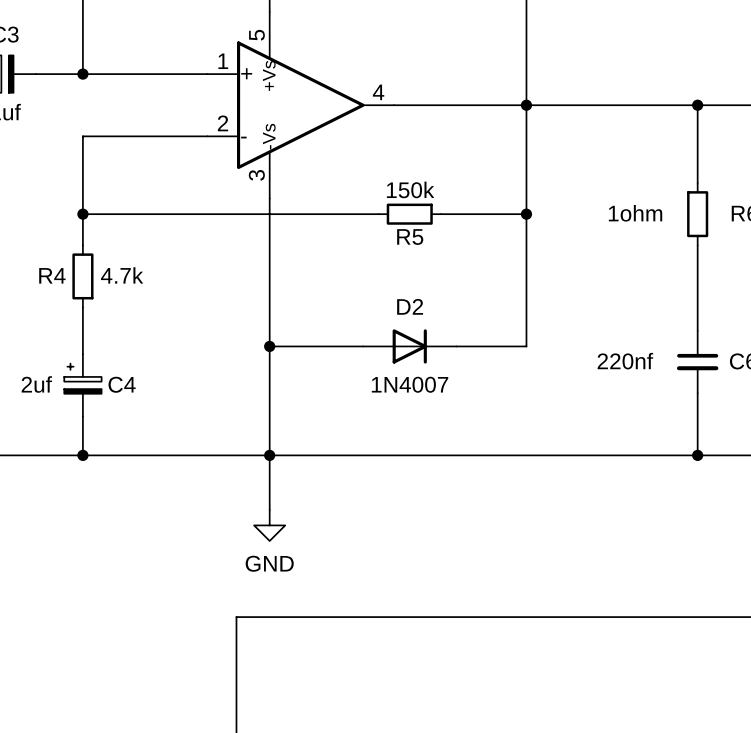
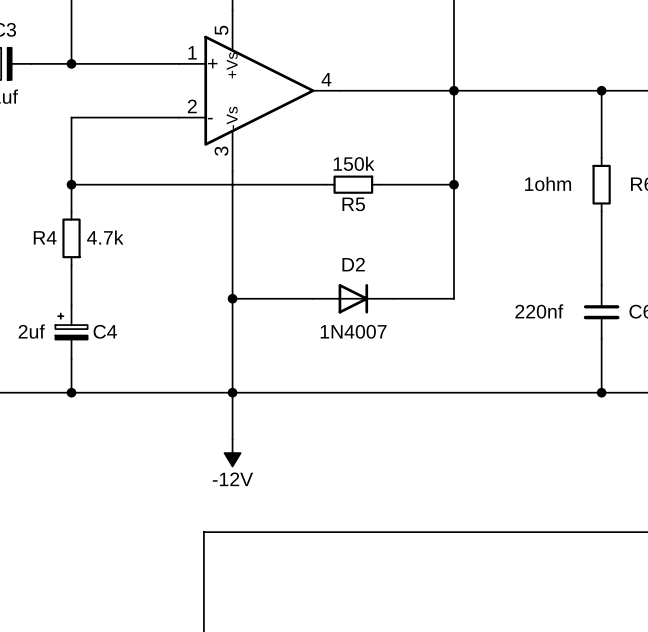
power symbol: GND (269, 525) -> -12V (232, 453)

